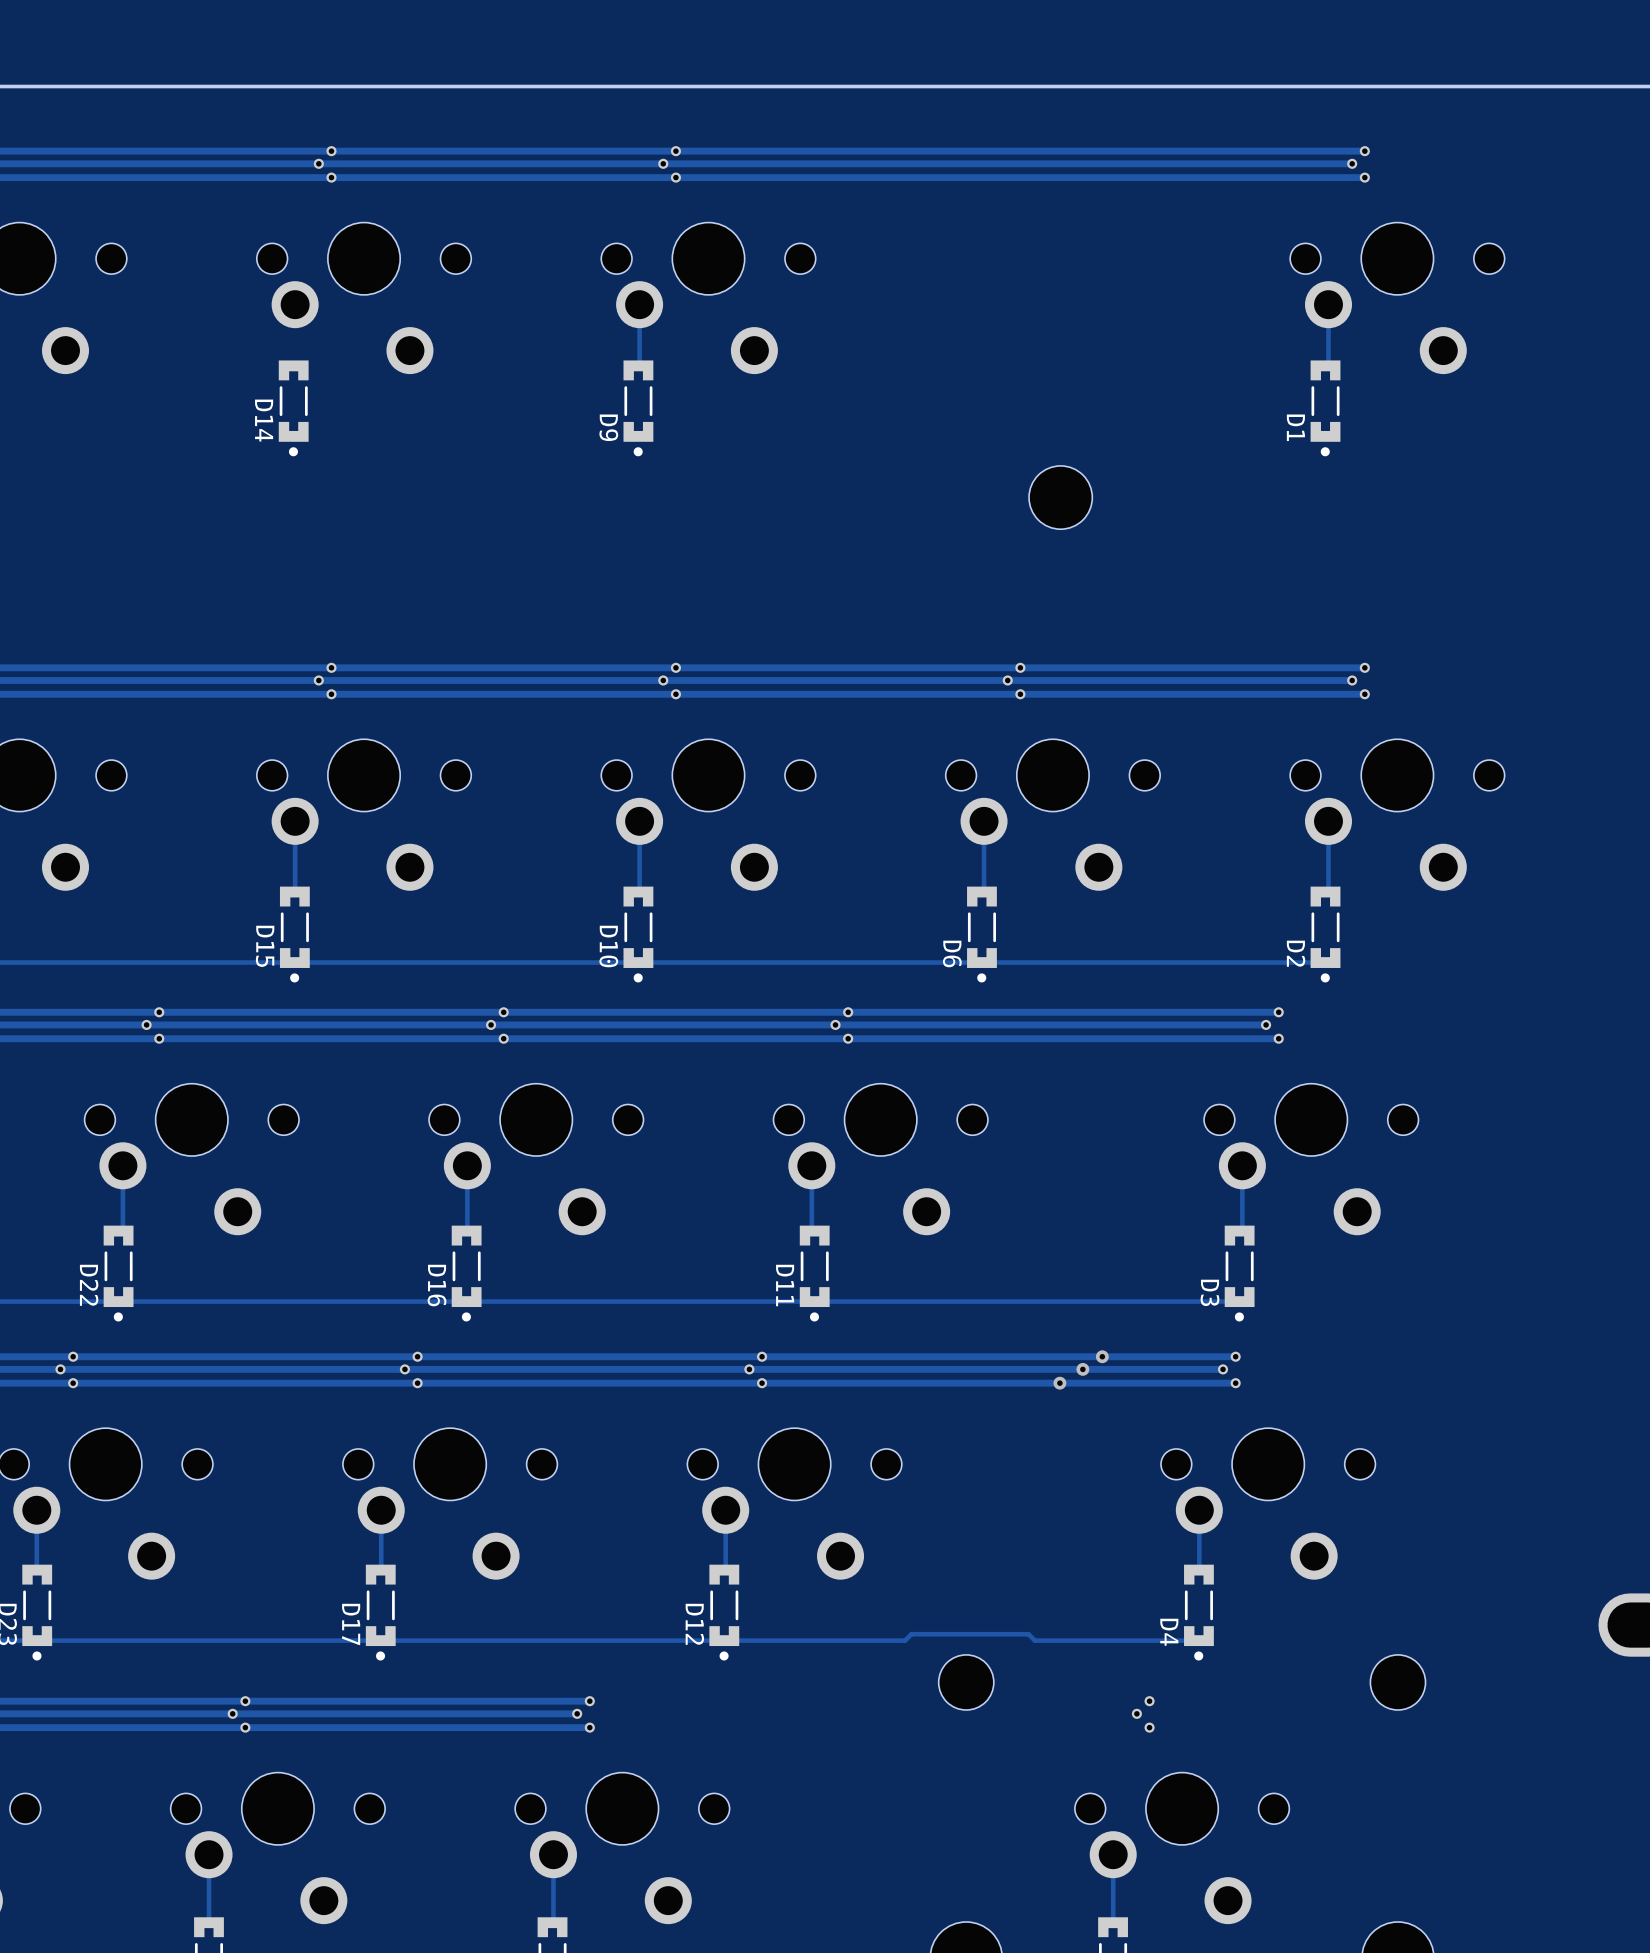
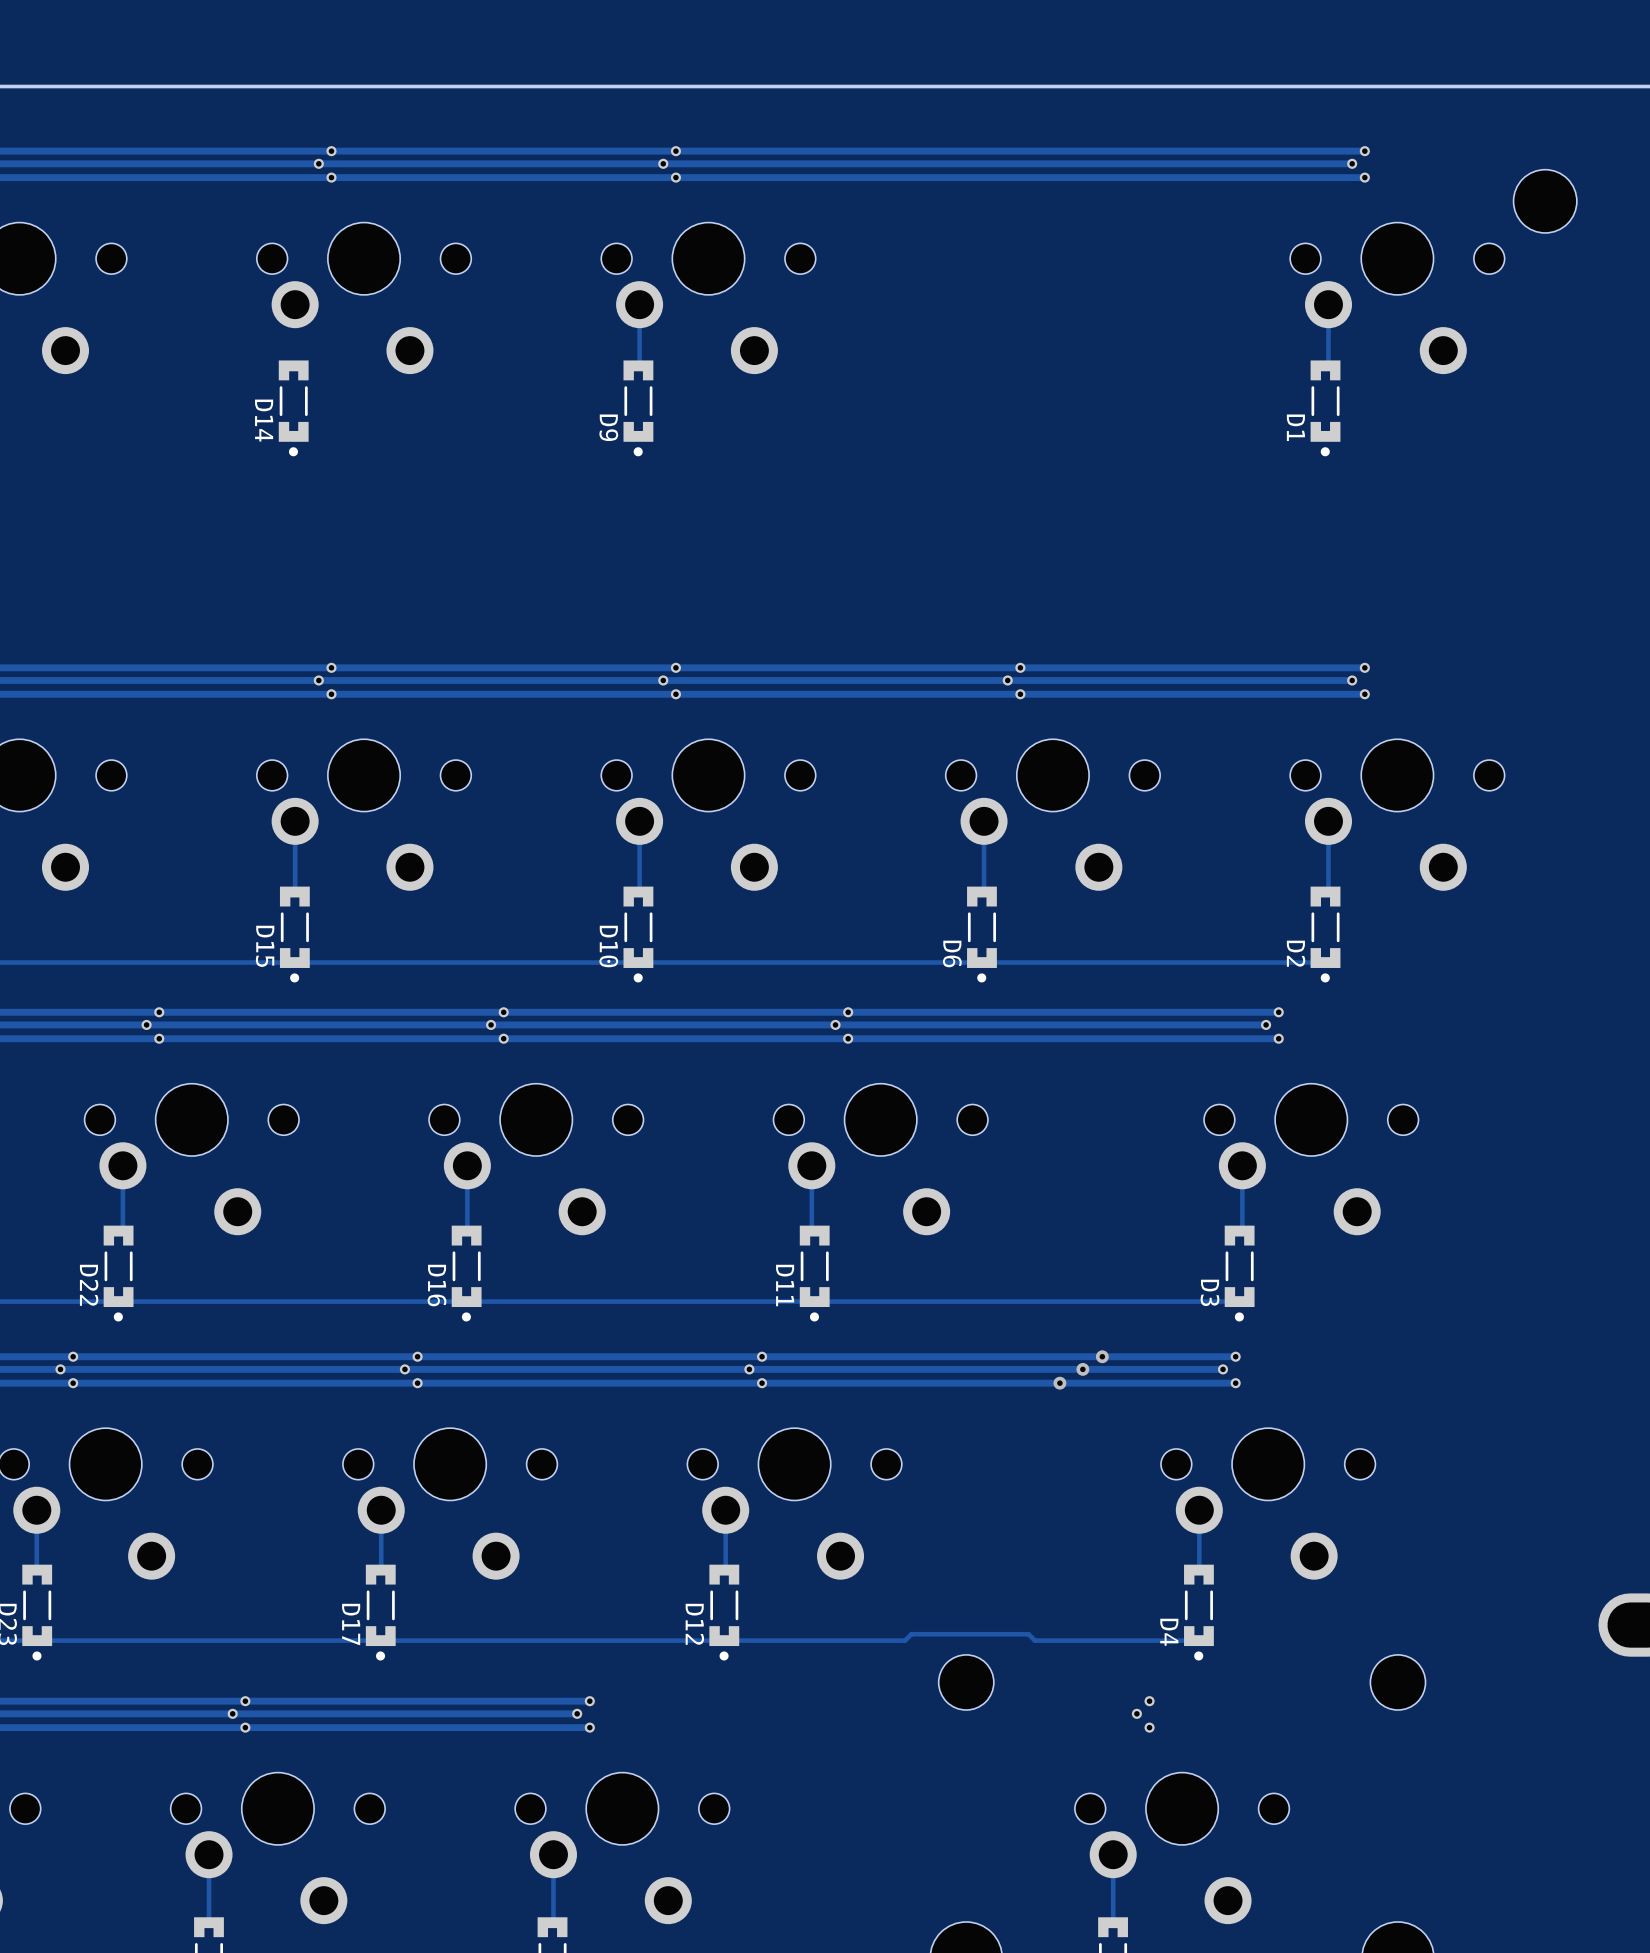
part: none -> (1545, 201)
part: (1060, 497) -> none

